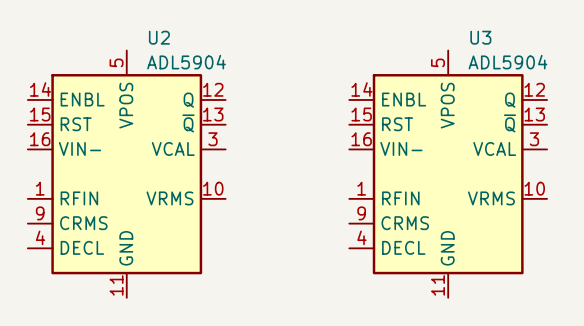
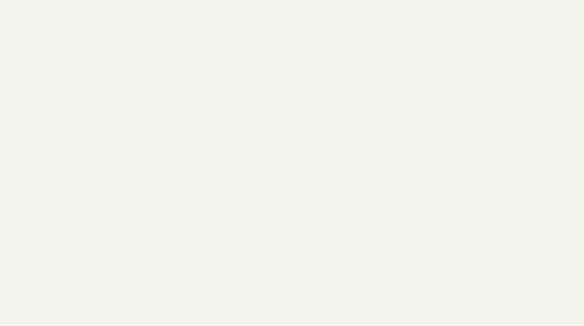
U2: ADL5904 (126, 174) -> none
U3: ADL5904 (448, 174) -> none

